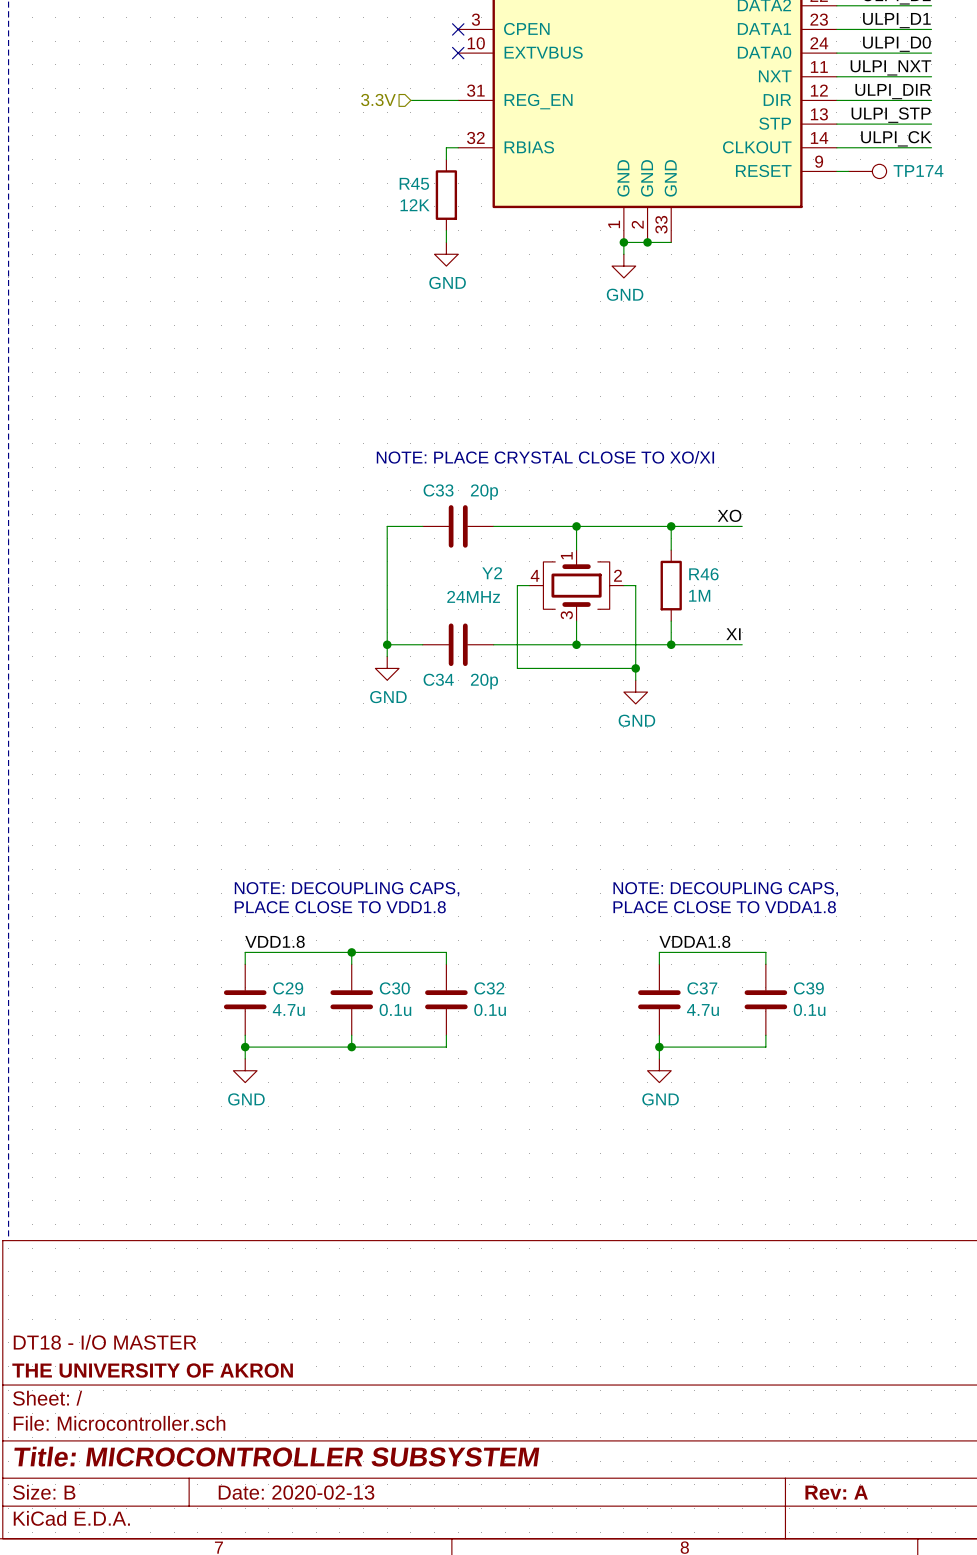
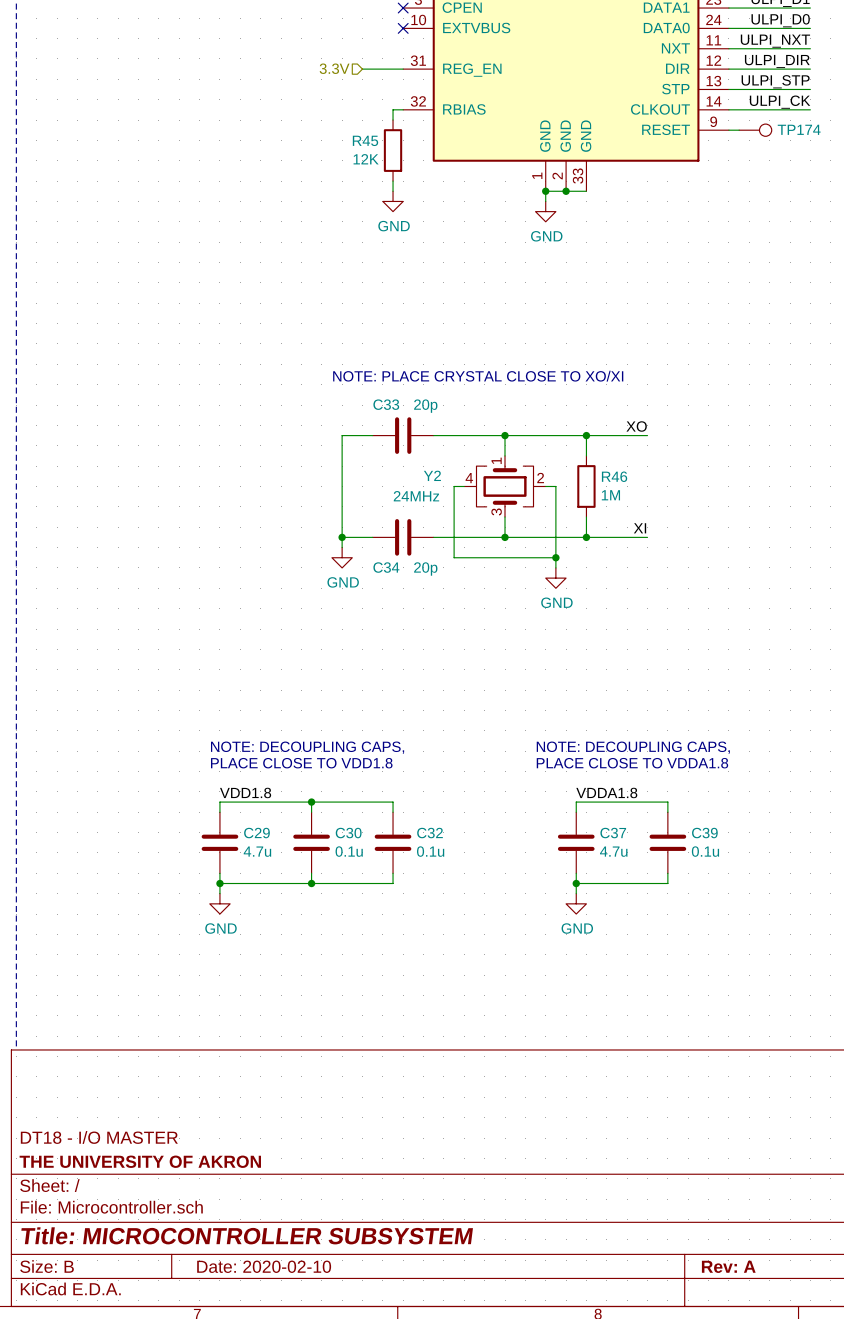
title block: Date: 2020-02-13 (296, 1492) -> Date: 2020-02-10 (264, 1266)

